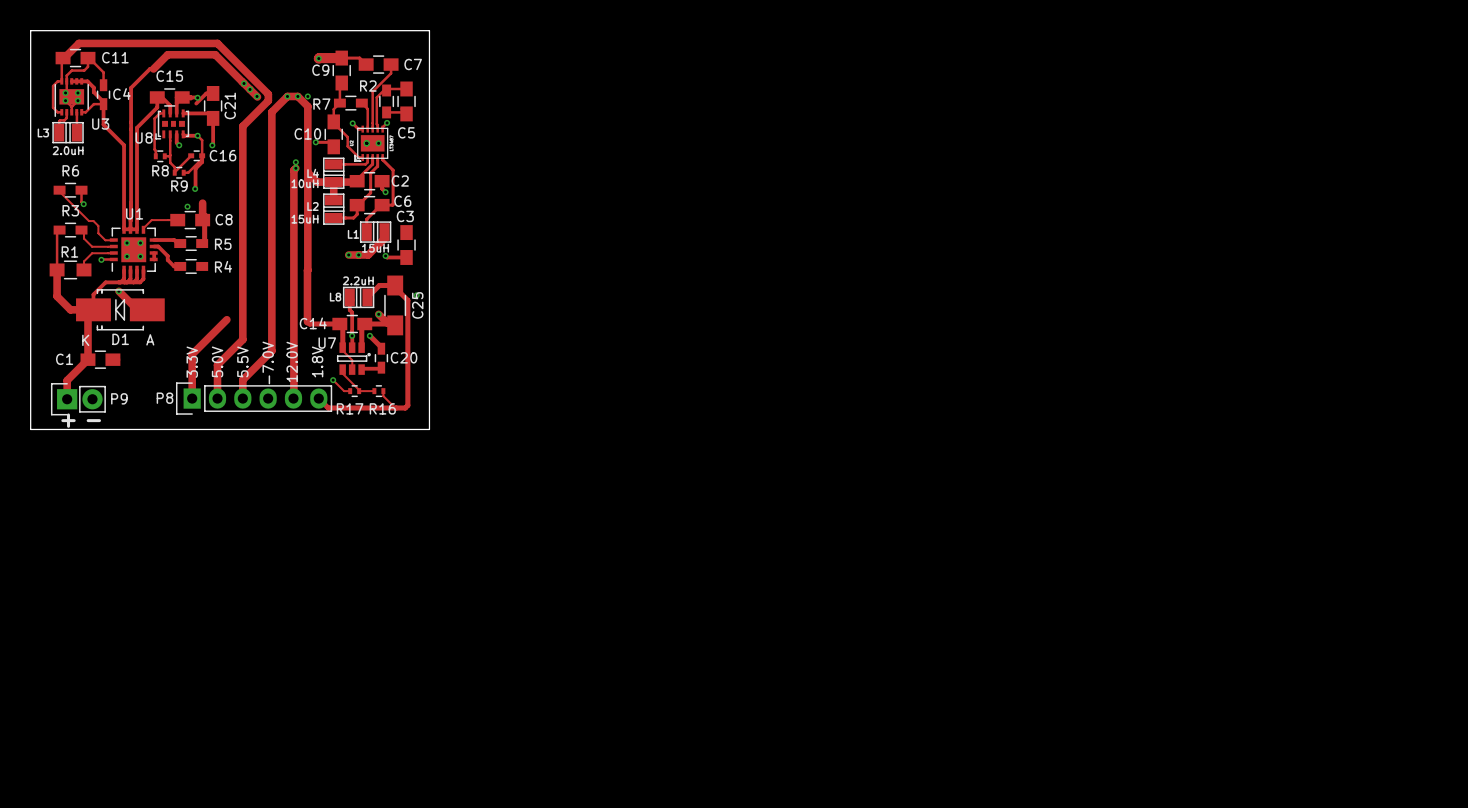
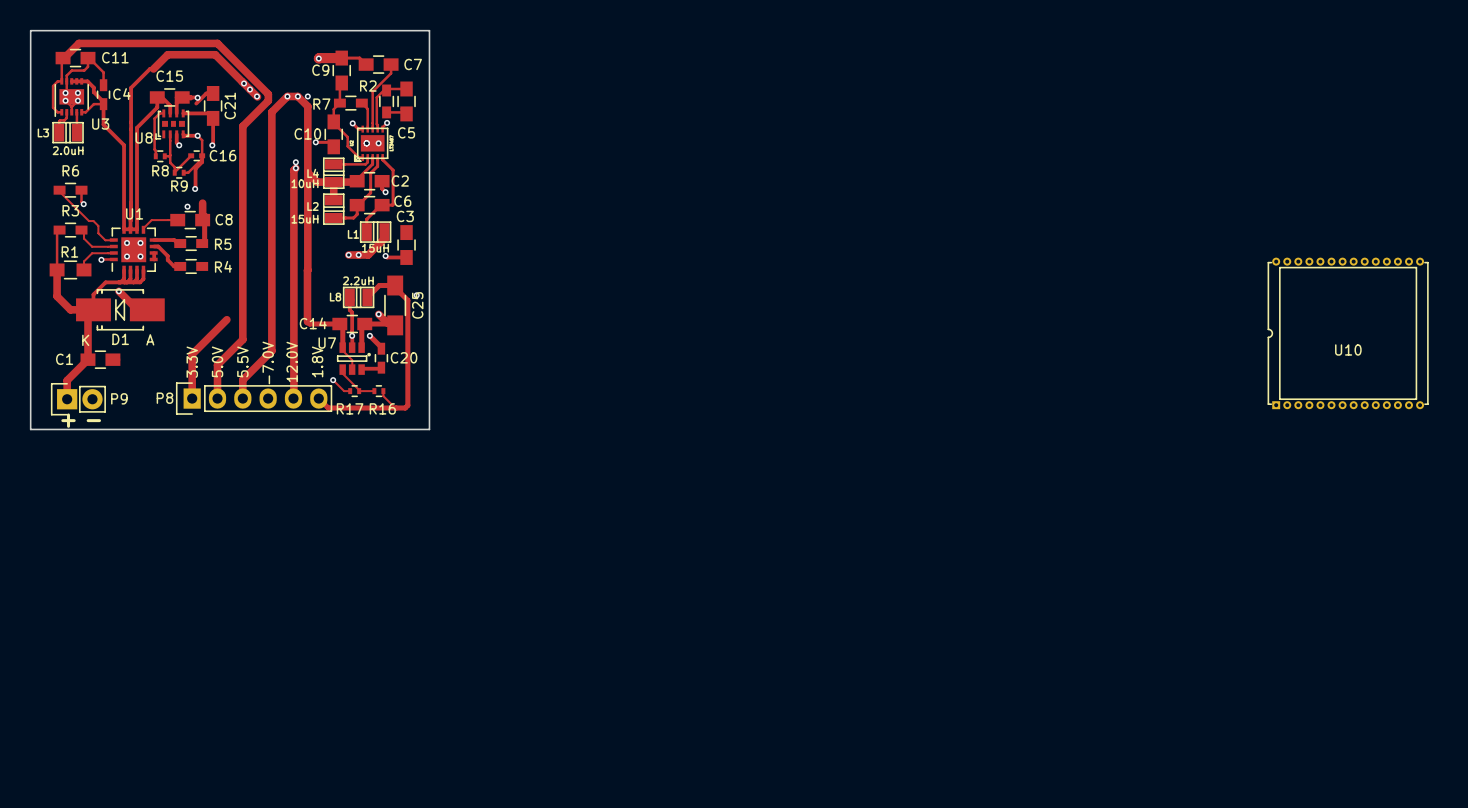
U10: none -> (1348, 333)

